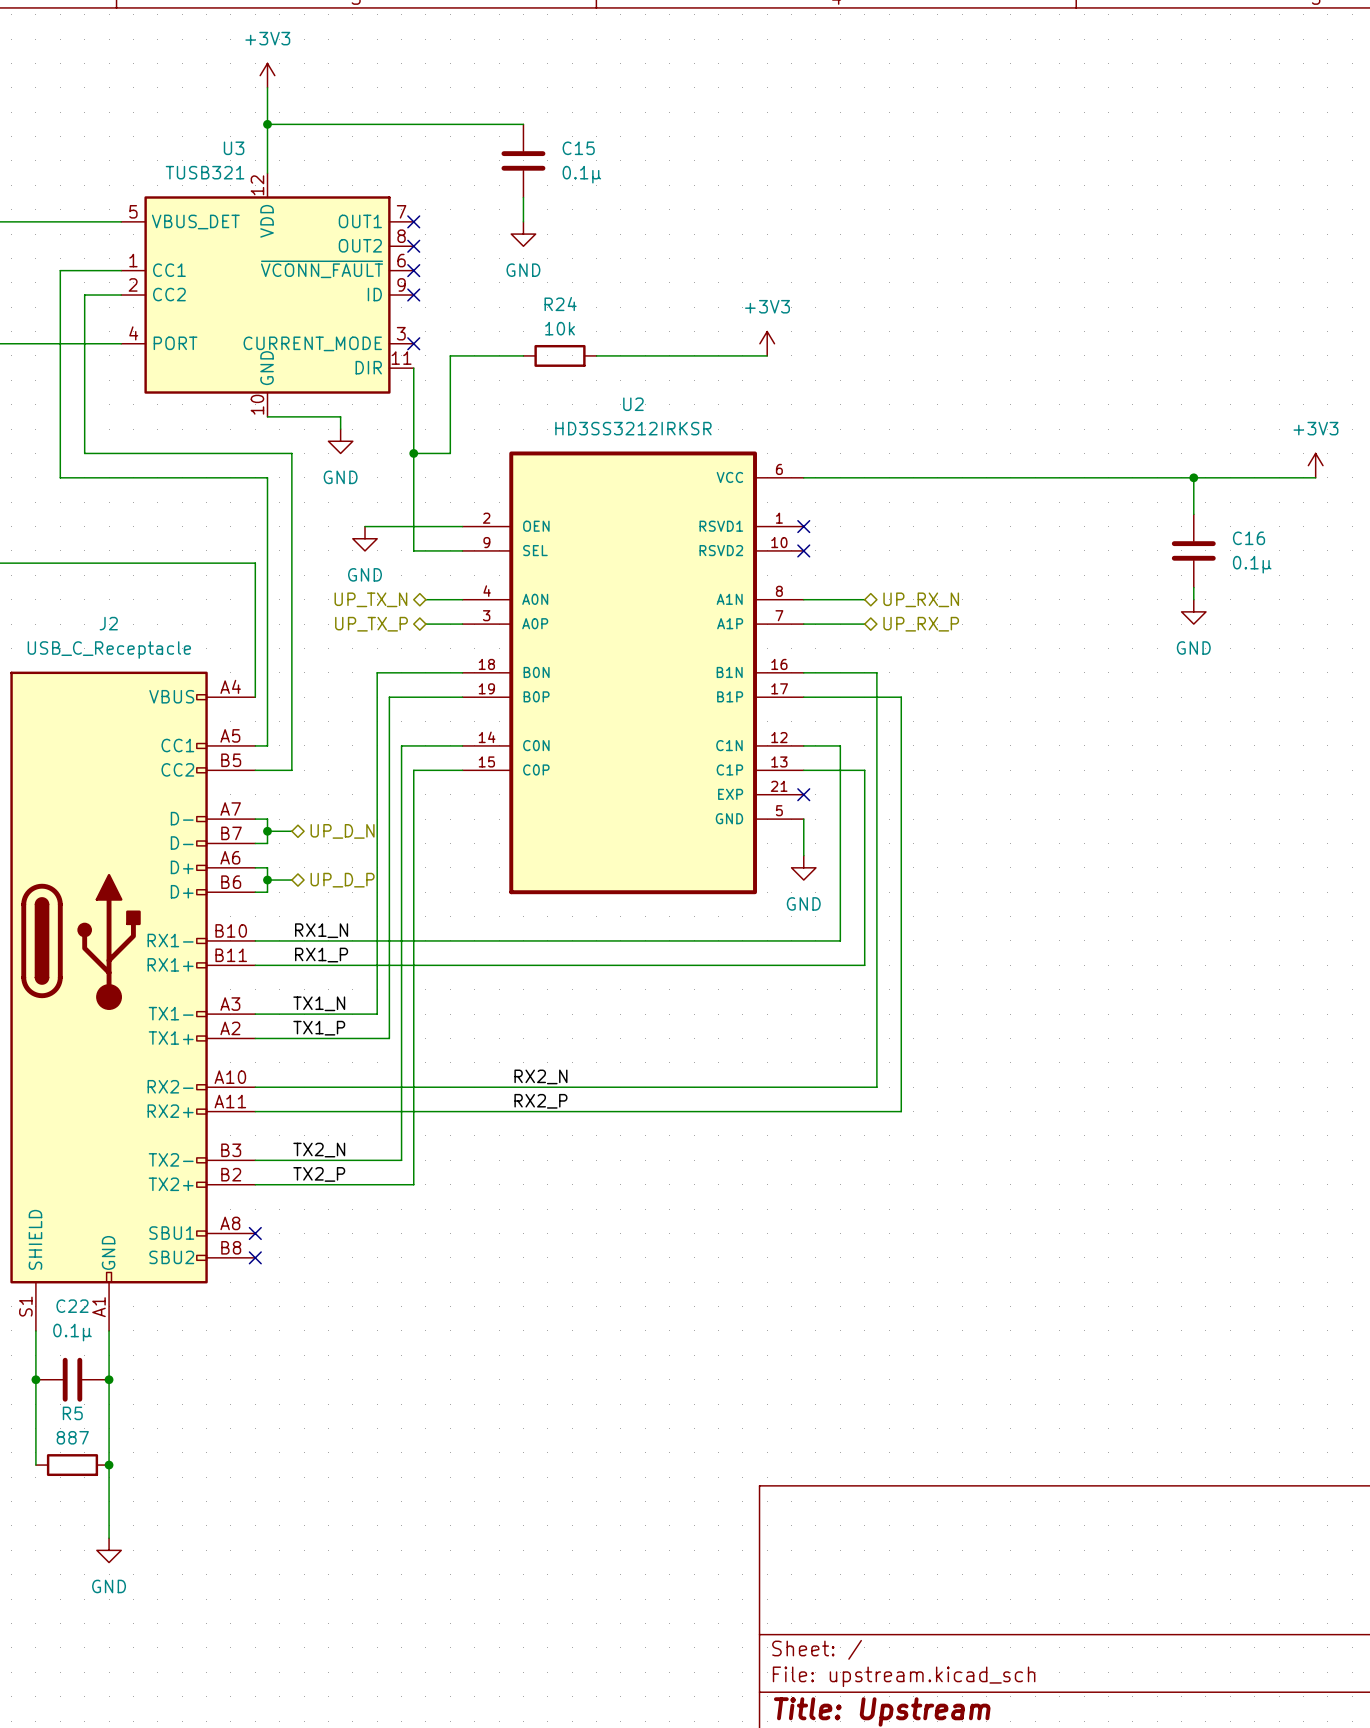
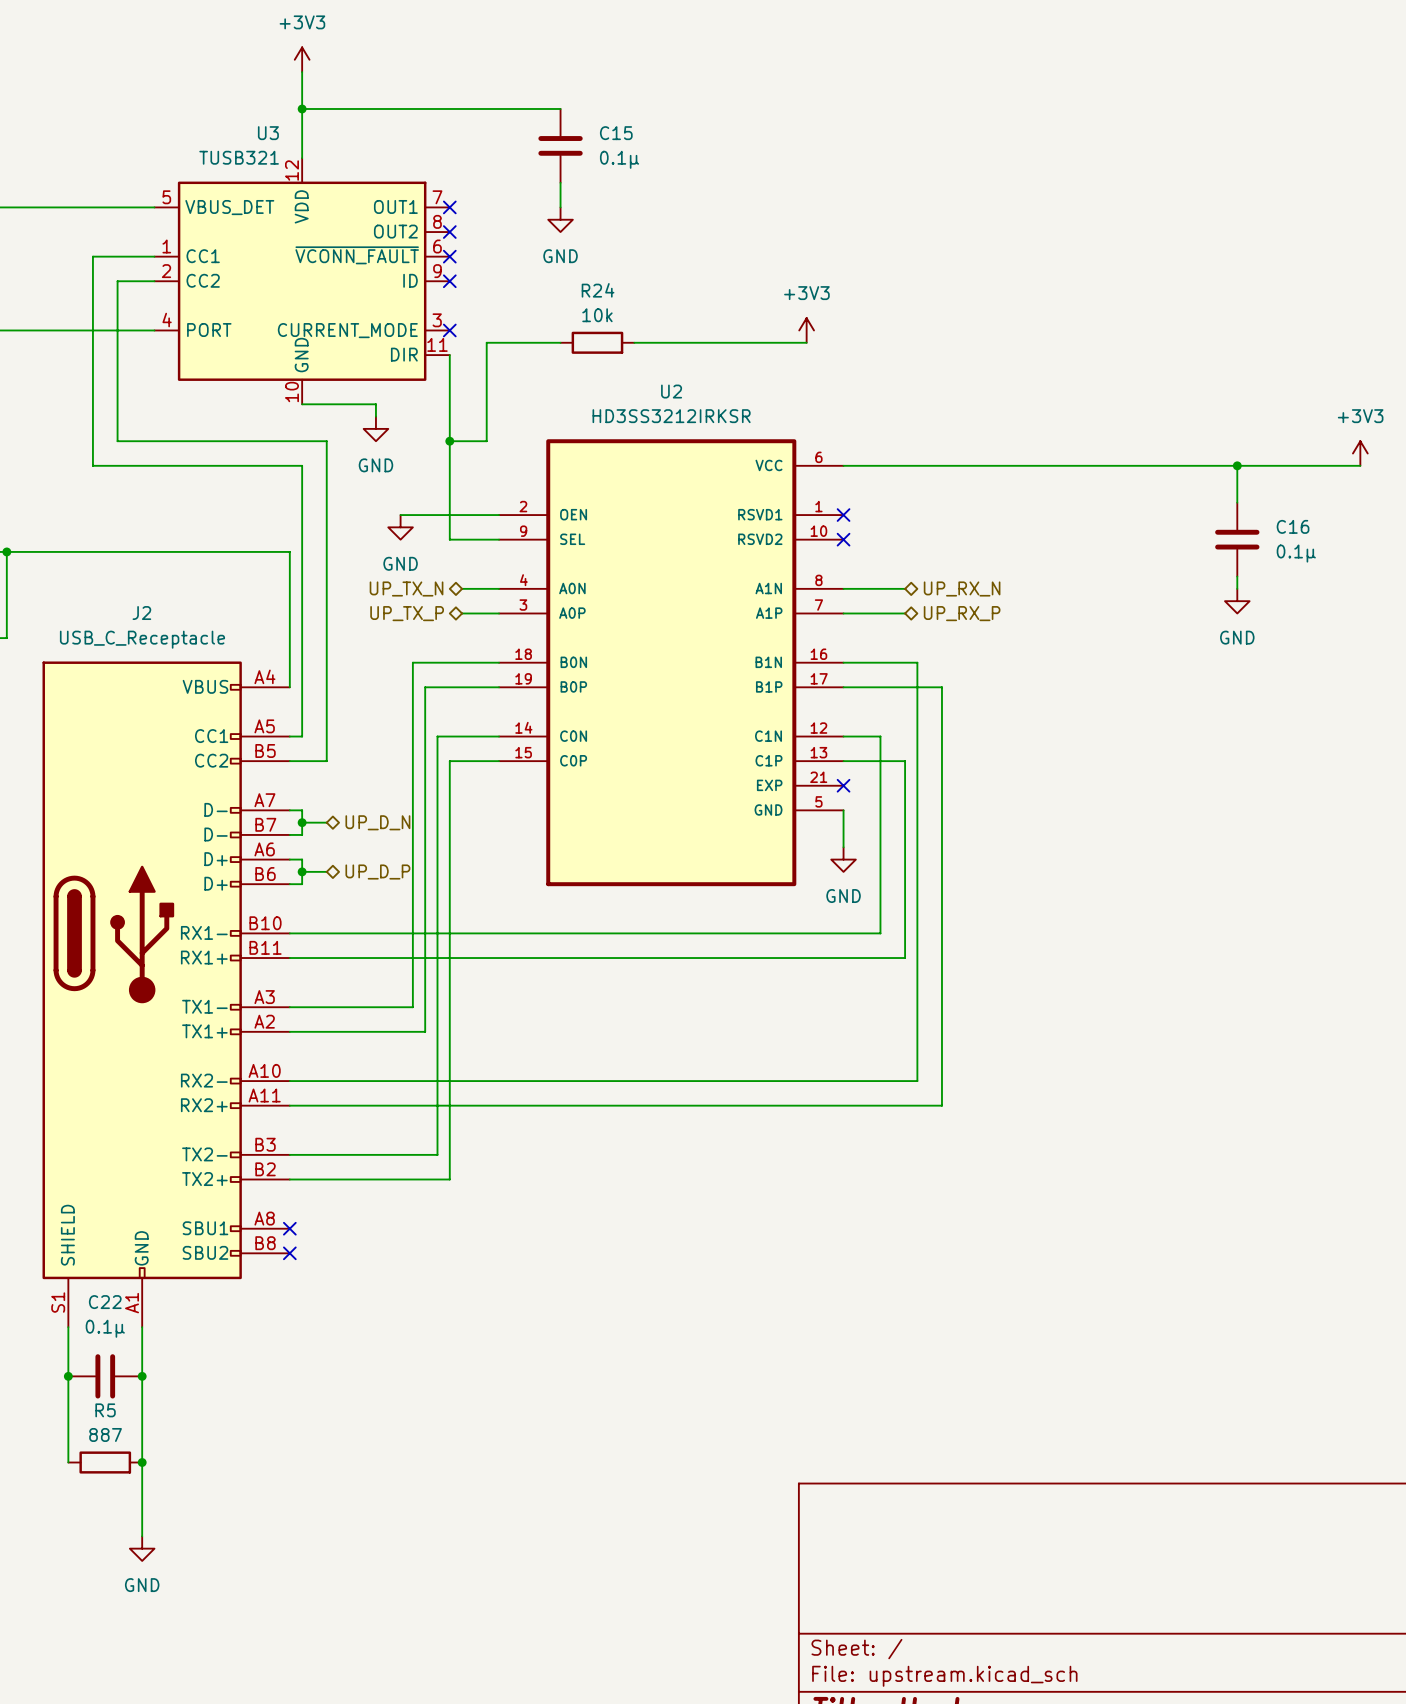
label: RX1_N (321, 930) -> none
label: RX1_P (321, 955) -> none
label: TX1_N (319, 1003) -> none
label: TX1_P (319, 1028) -> none
label: RX2_N (540, 1076) -> none
label: RX2_P (540, 1101) -> none
label: TX2_N (319, 1150) -> none
label: TX2_P (319, 1174) -> none

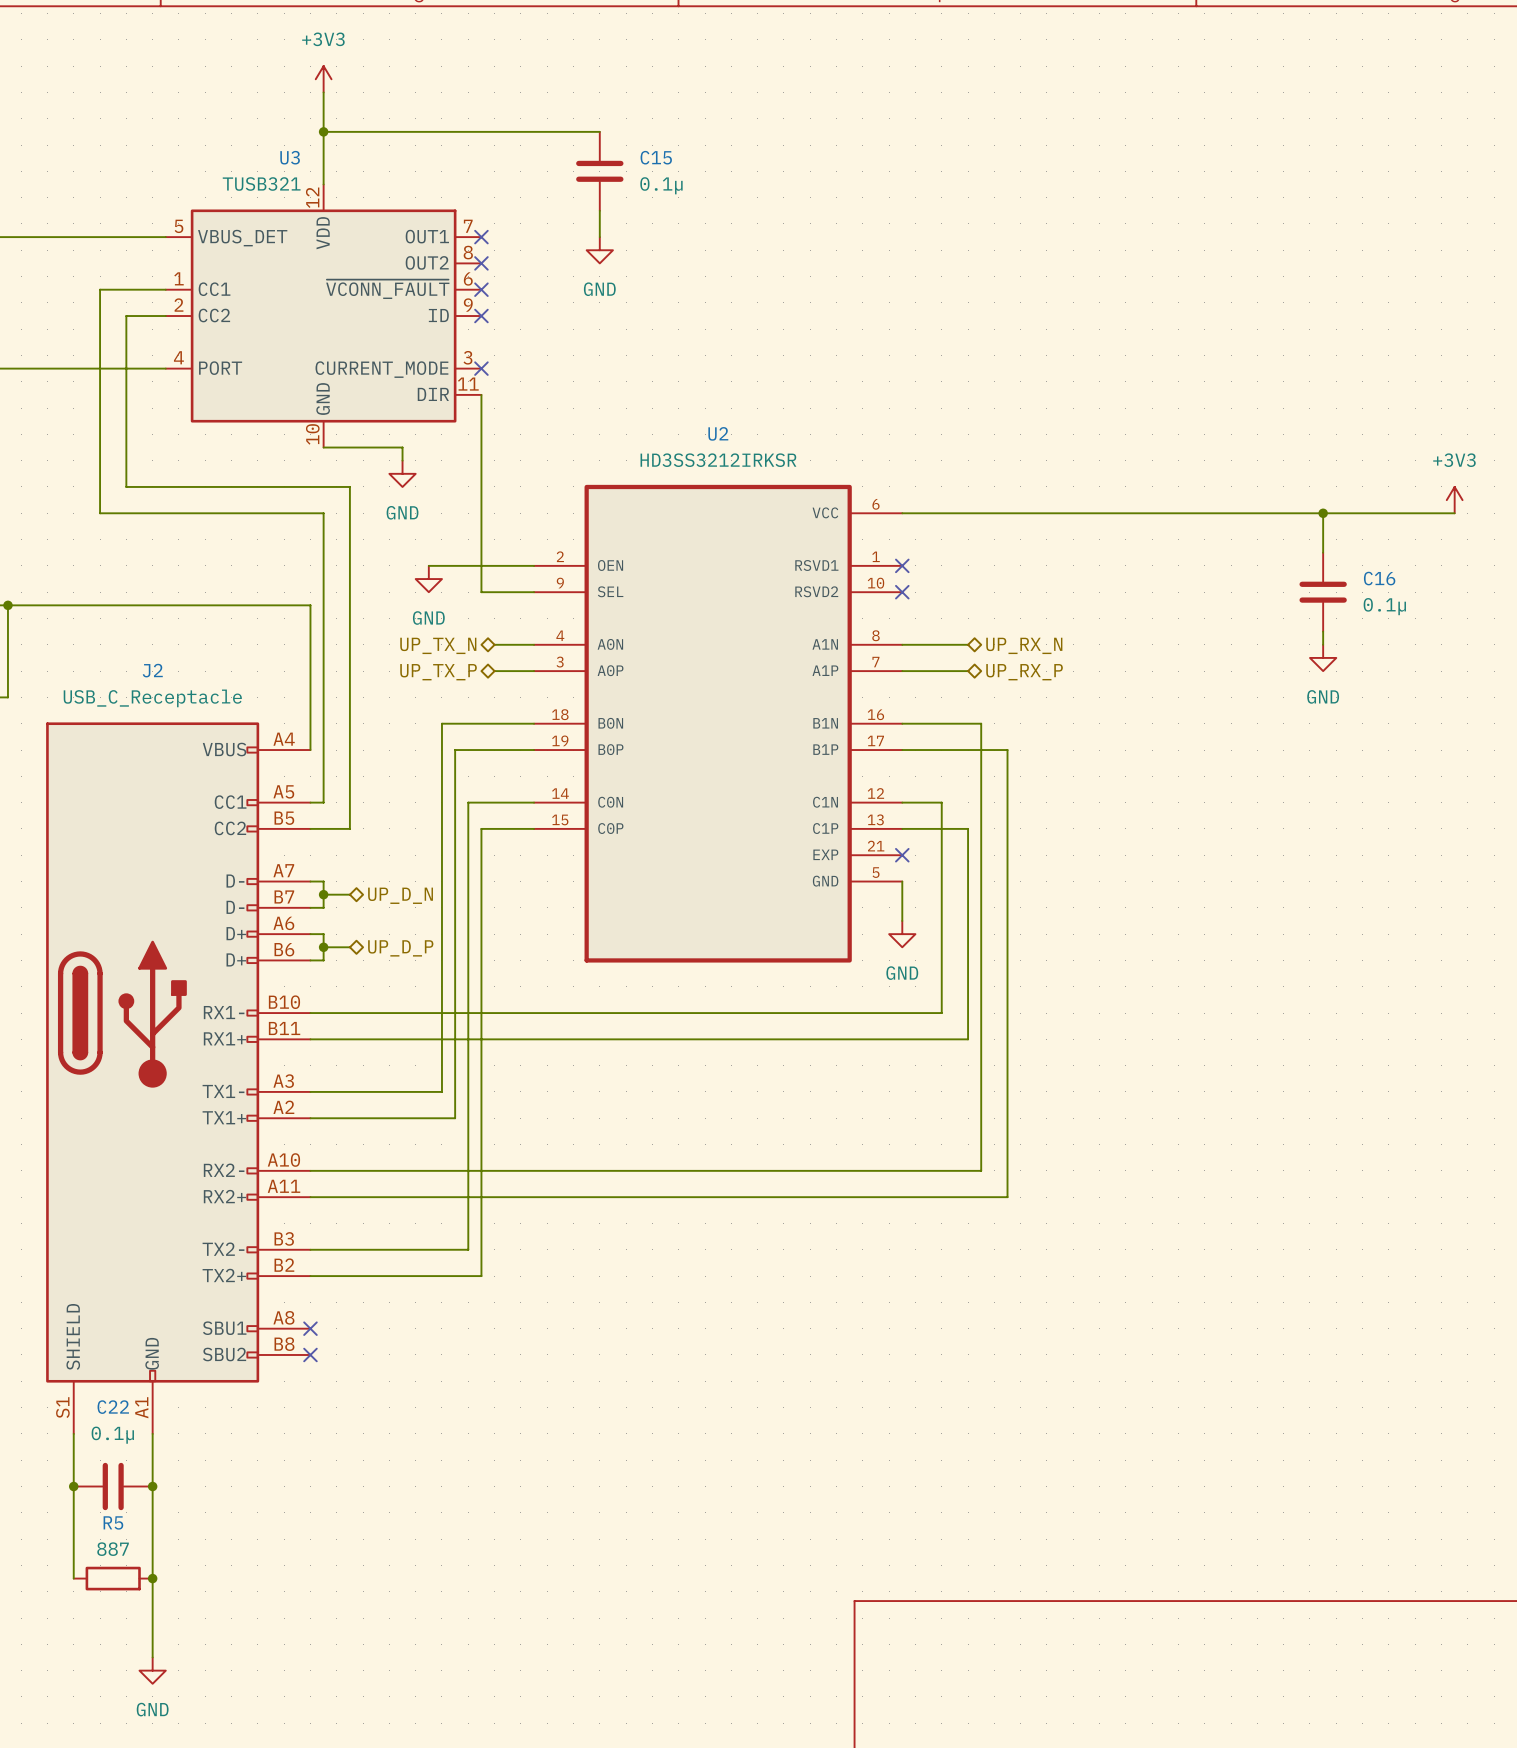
power symbol: +3V3 (806, 330) -> none
wire: (560, 342) (486, 342) (486, 441) (449, 441) -> none
R24: 10k (597, 342) -> none
wire: (634, 342) (806, 342) -> none
junction: (449, 441) -> none

